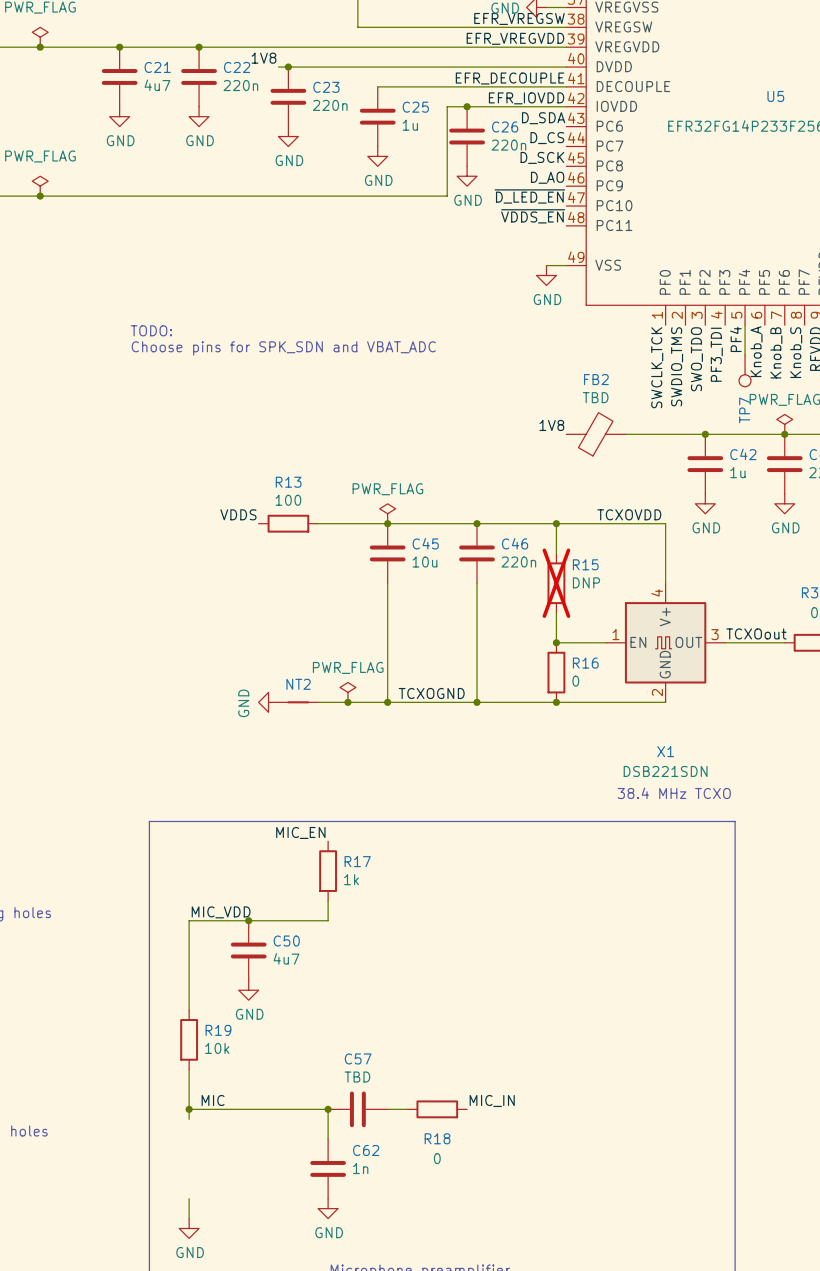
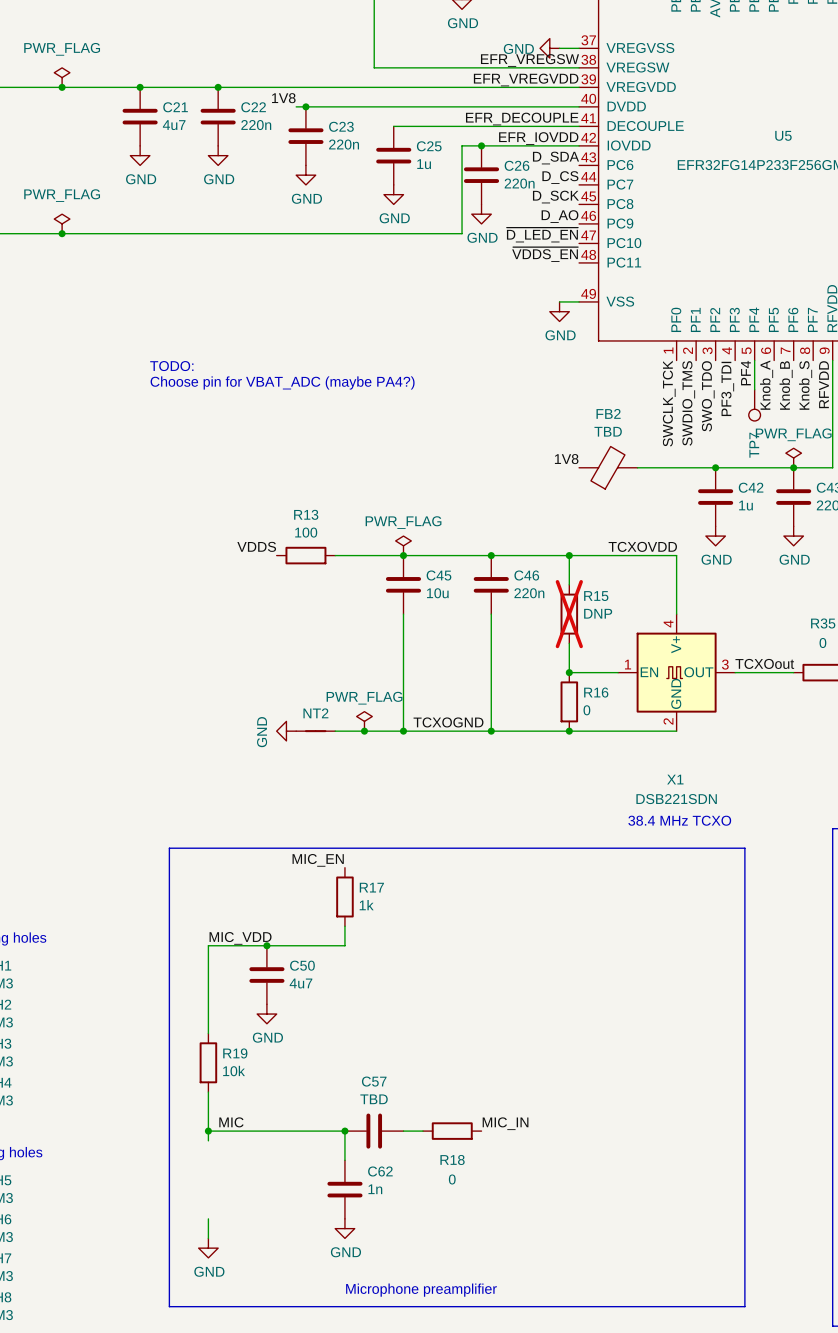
text: Choose pins for SPK_SDN and VBAT_ADC (283, 348) -> Choose pin for VBAT_ADC (maybe PA4?) (282, 382)

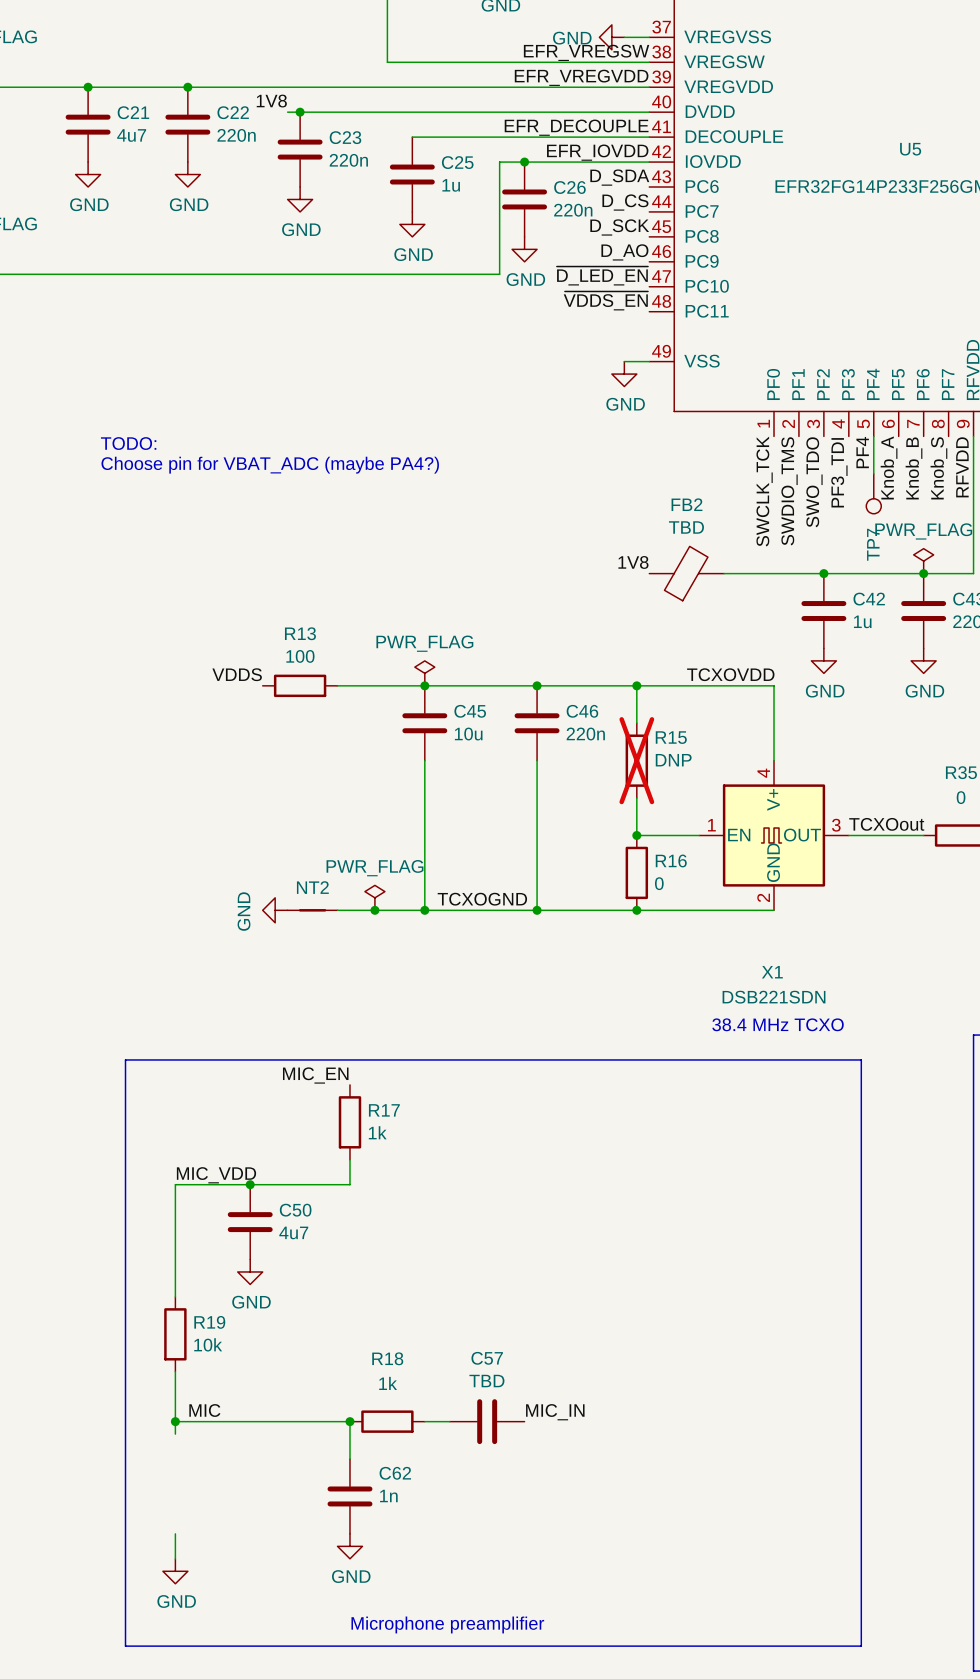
C57 position: (374, 1131) -> (487, 1421)
R18 position: (452, 1131) -> (387, 1421)
R18 name position: R18 (452, 1159) -> R18 (387, 1358)
R18 value: 0 (452, 1179) -> 1k (388, 1383)

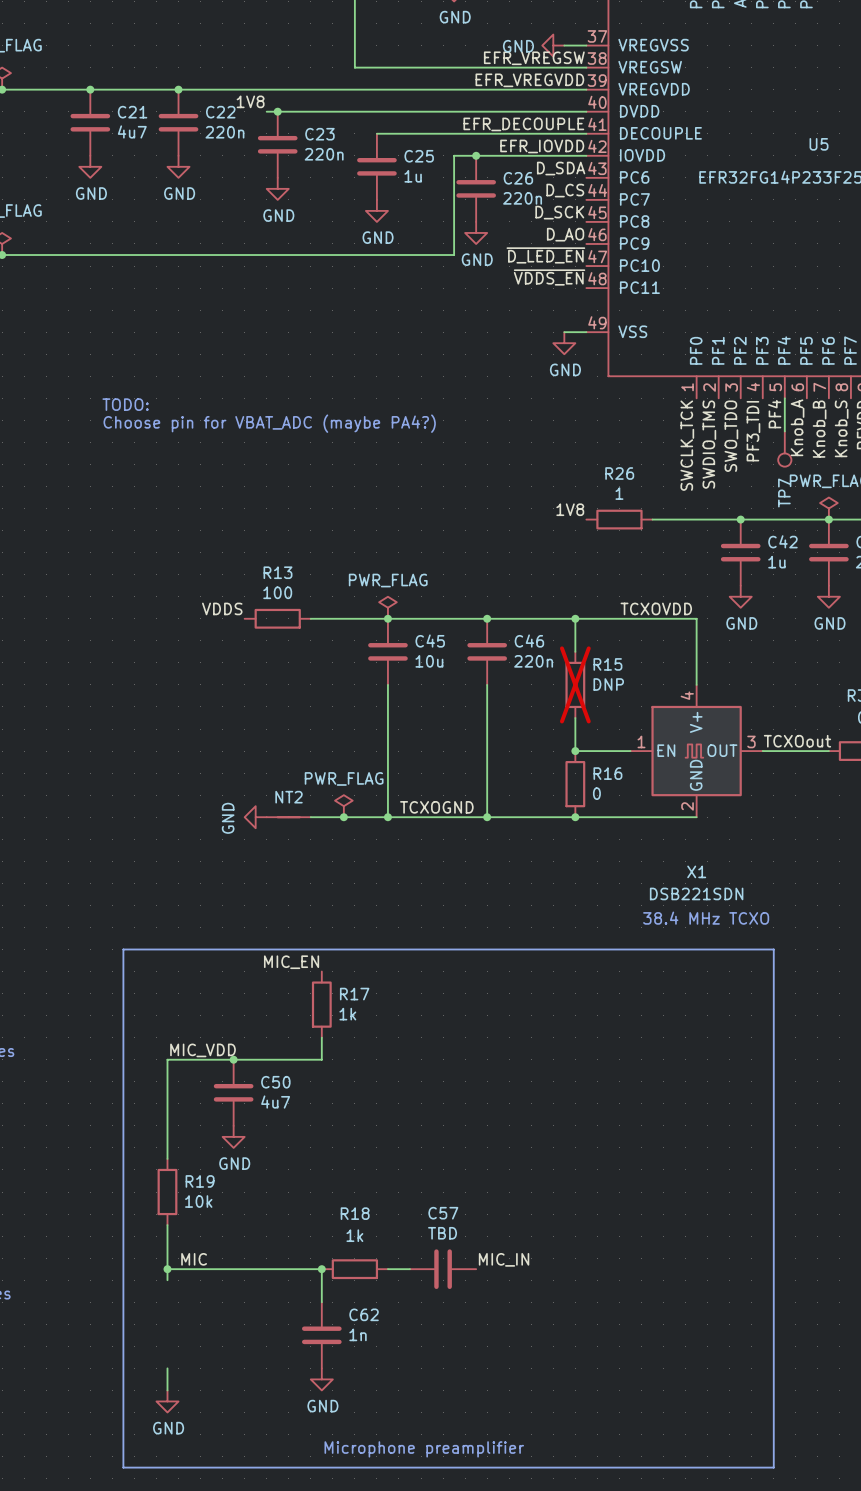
FB2: TBD (686, 573) -> none
R26: none -> 1 (619, 519)

